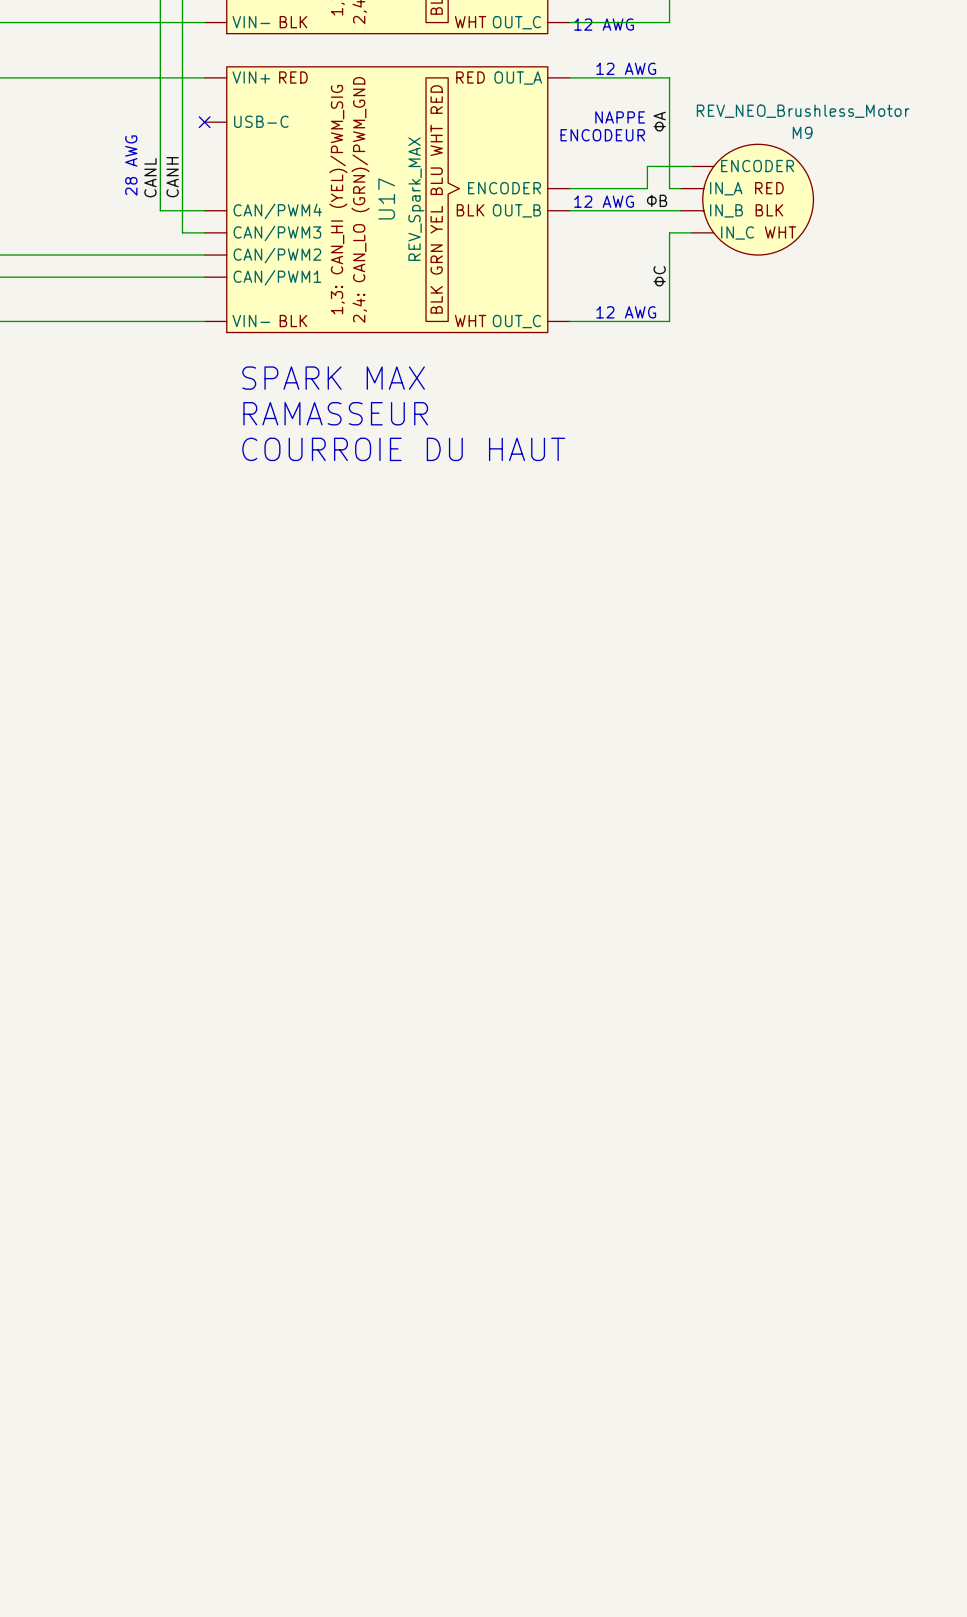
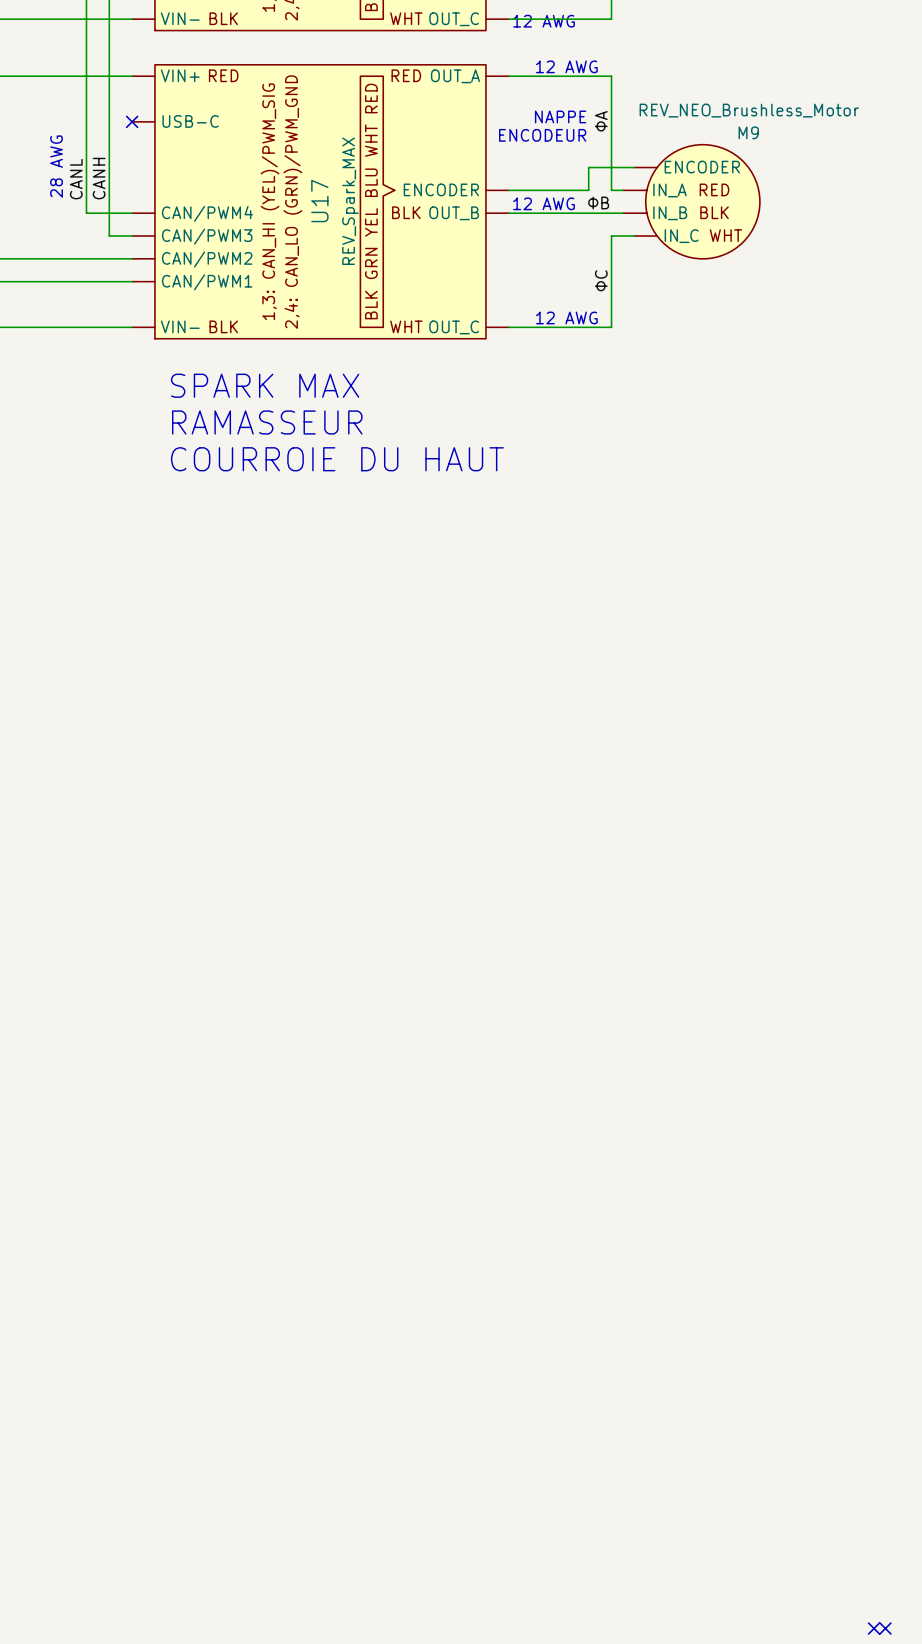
no-connect mark: none -> (874, 1628)
no-connect mark: none -> (885, 1628)

